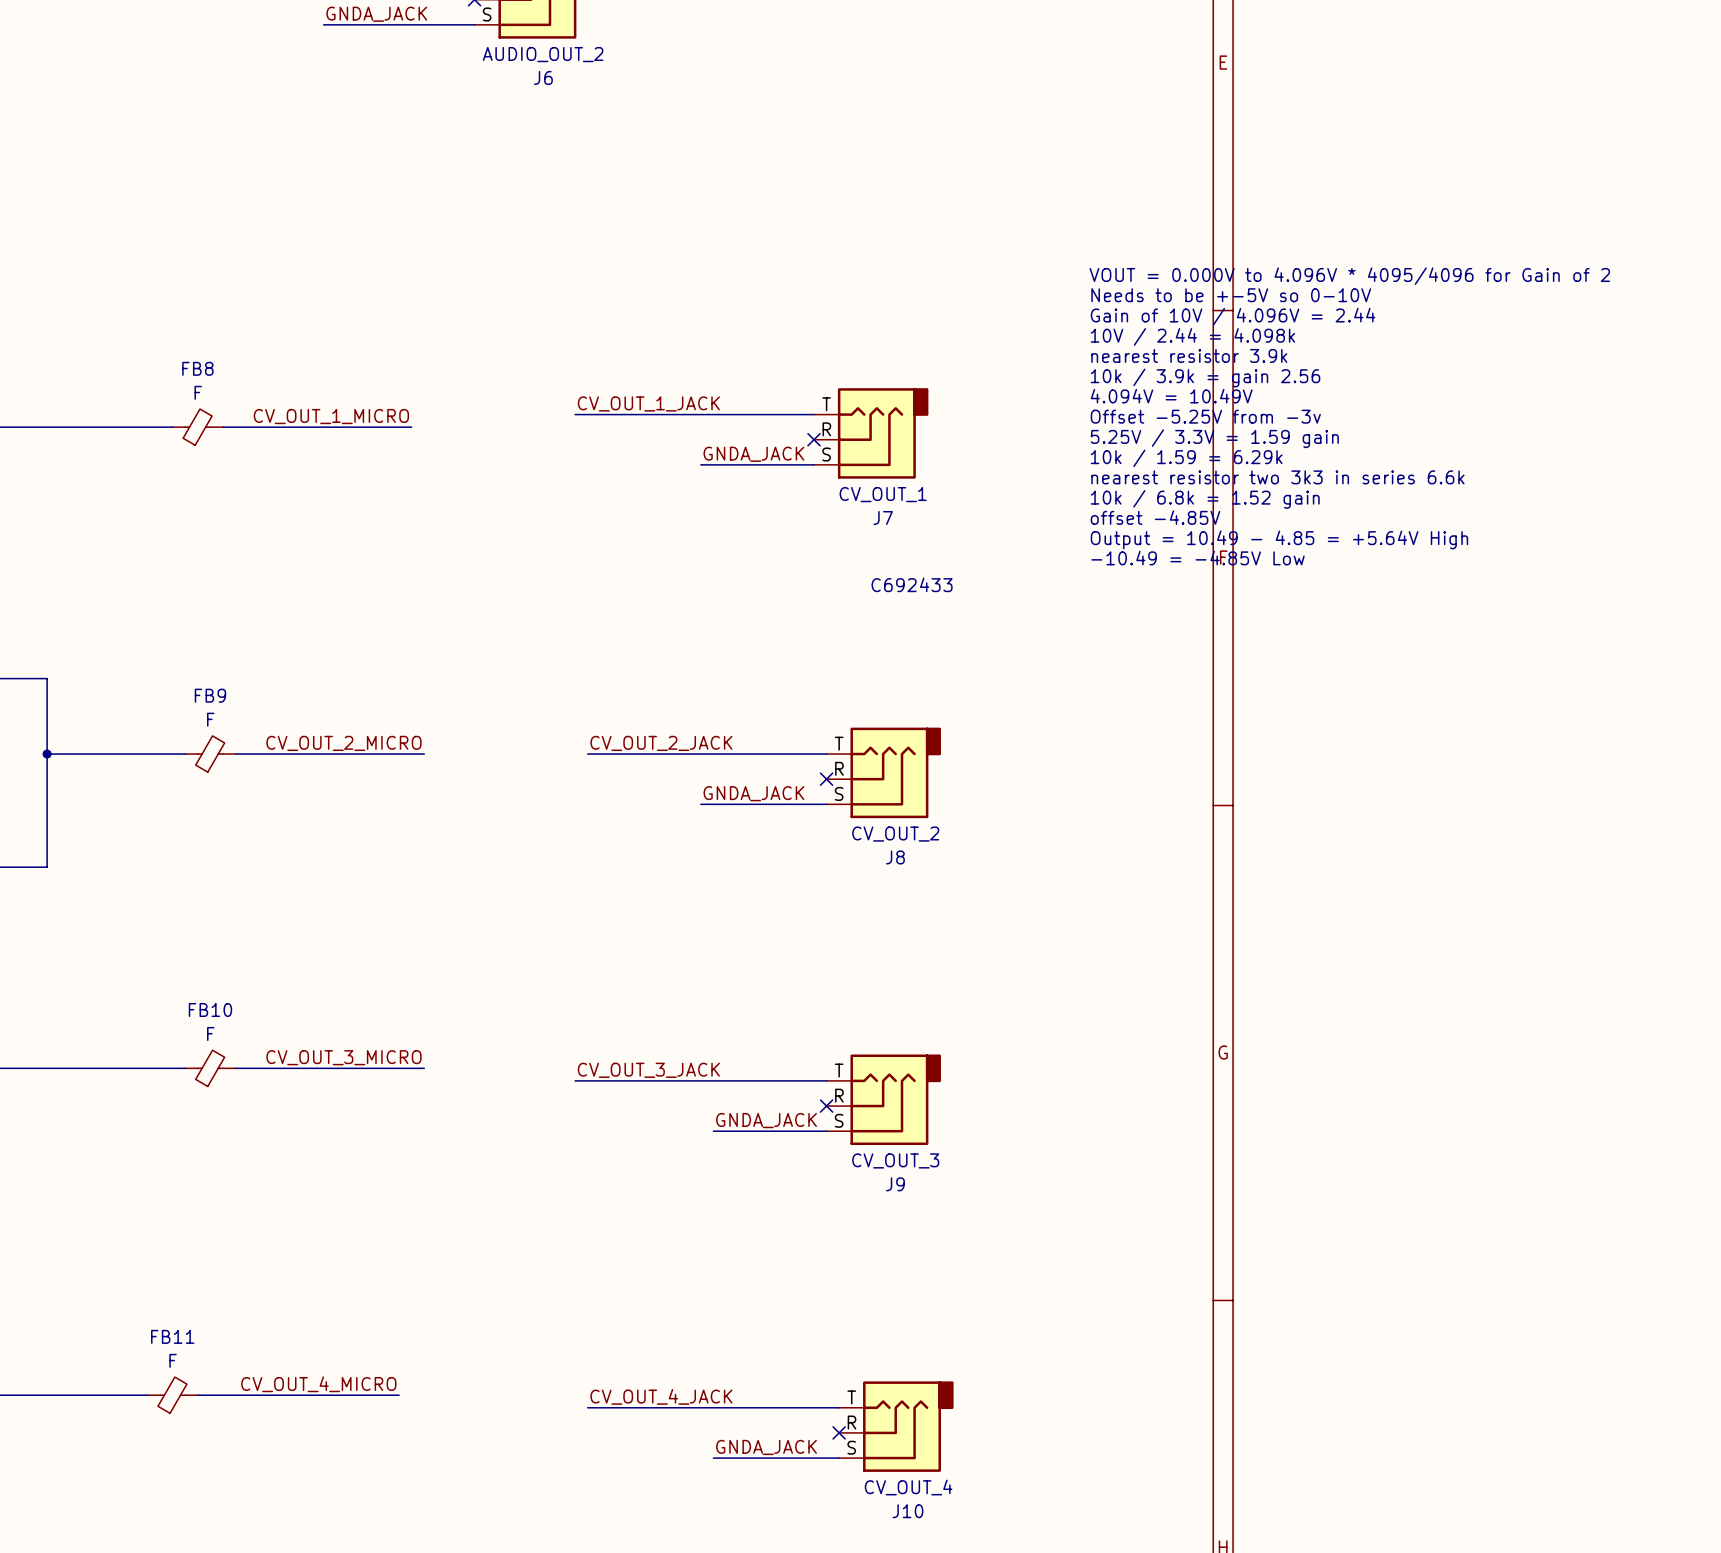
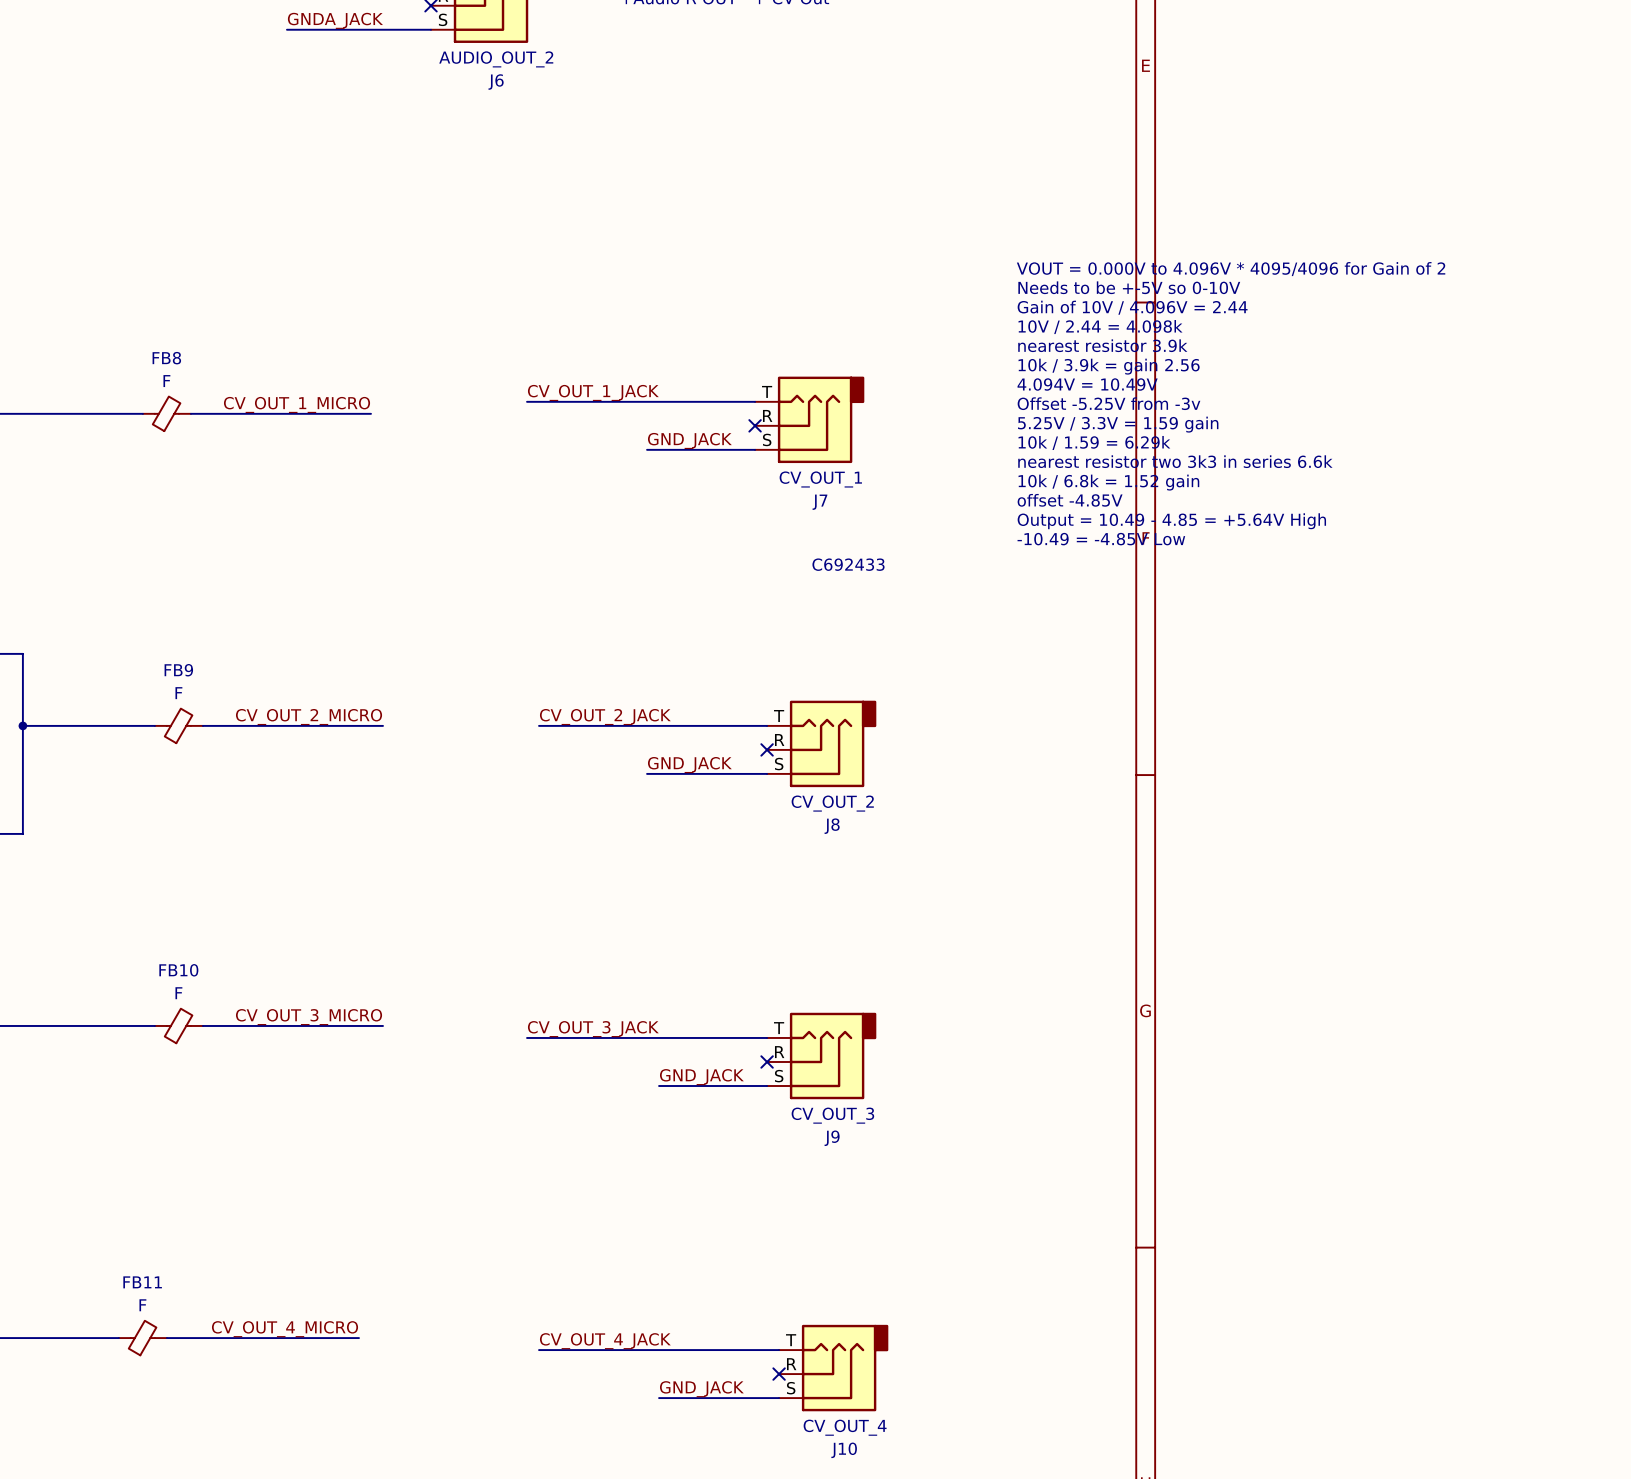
label: GNDA_JACK (753, 454) -> GND_JACK (689, 440)
label: GNDA_JACK (753, 793) -> GND_JACK (689, 765)
label: GNDA_JACK (766, 1120) -> GND_JACK (701, 1077)
label: GNDA_JACK (766, 1447) -> GND_JACK (701, 1389)

